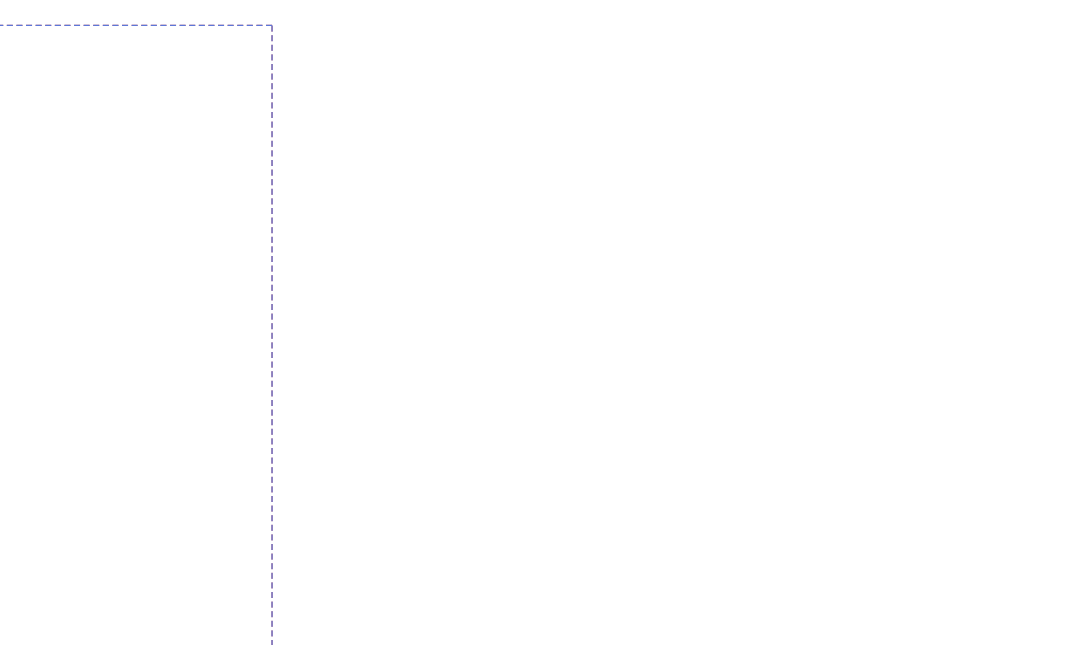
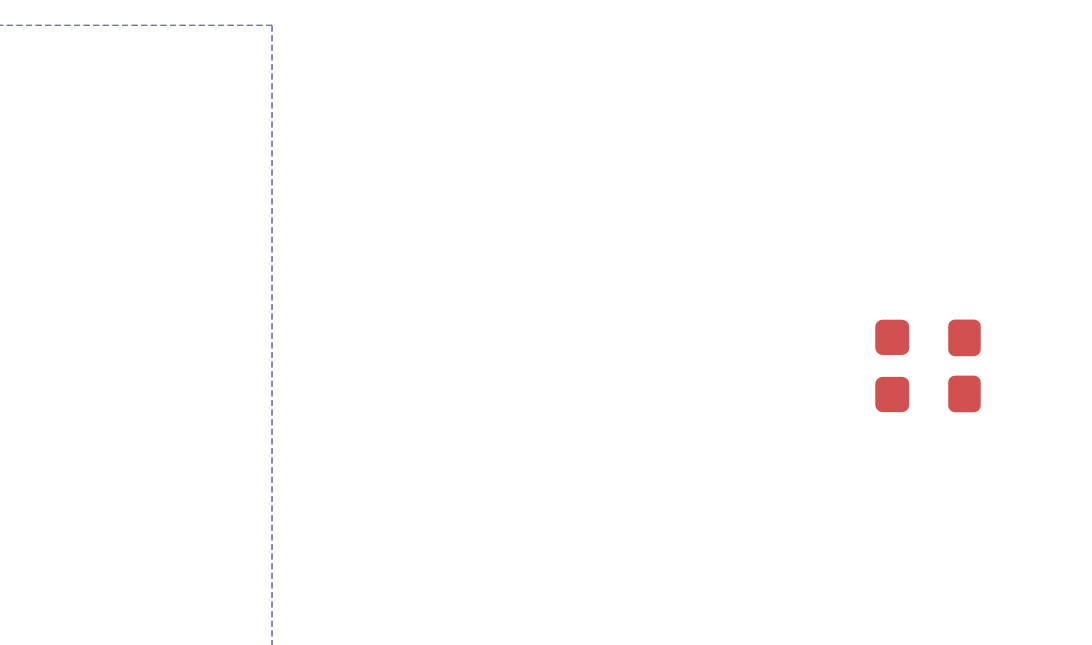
part: none -> (892, 365)
part: none -> (964, 365)

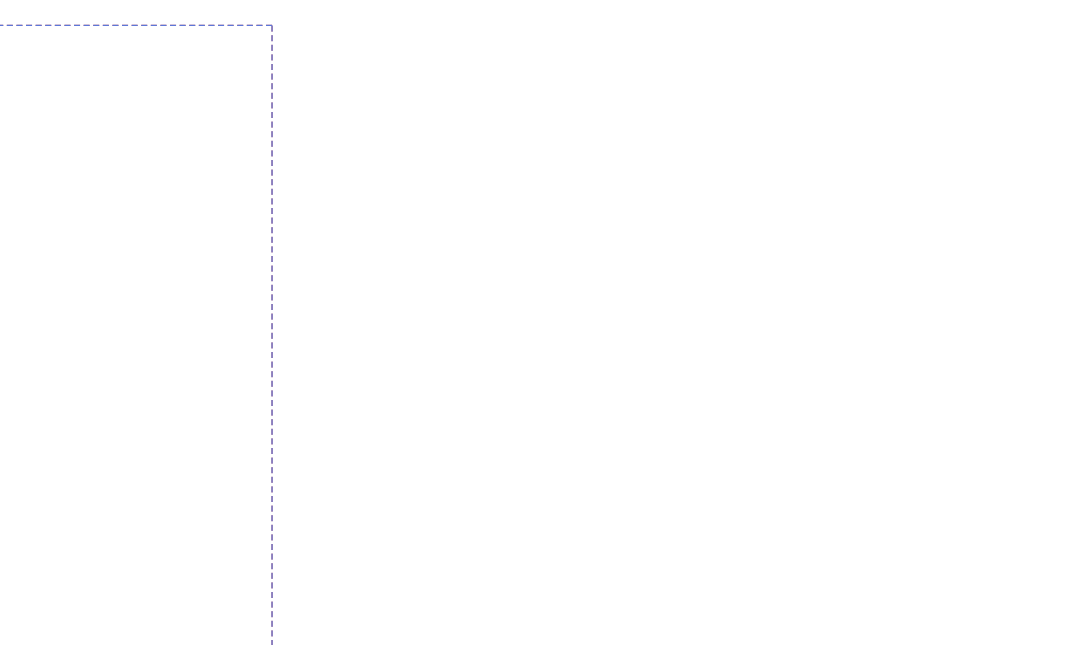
part: (892, 365) -> none
part: (964, 365) -> none

